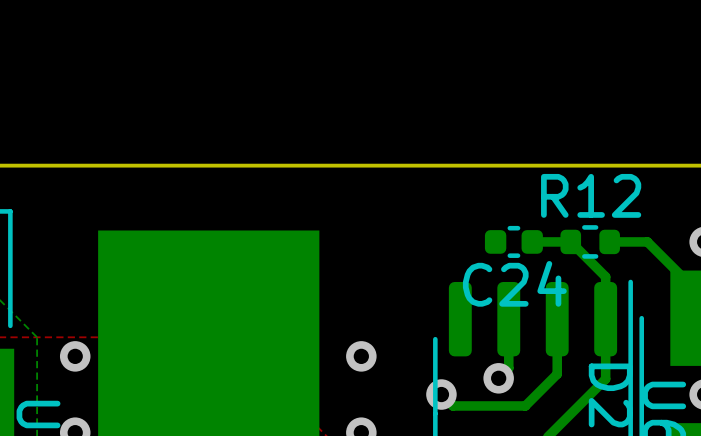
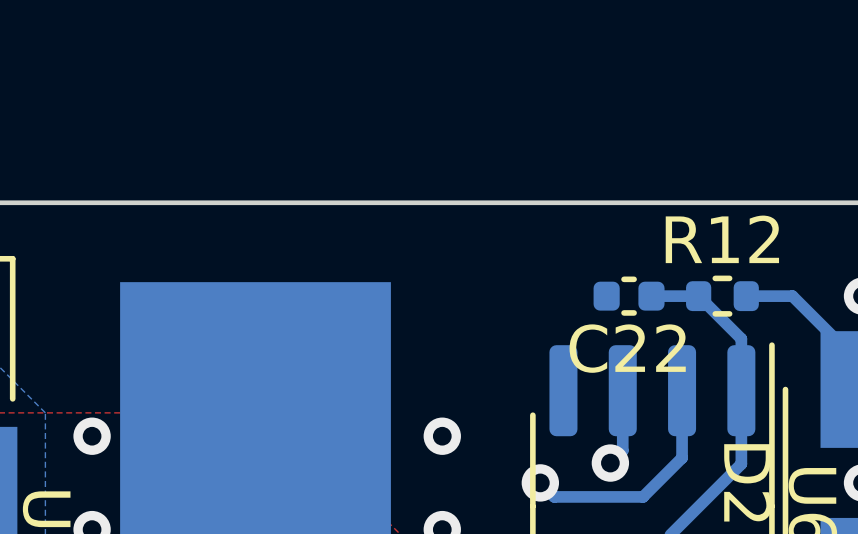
C24 name: C24 (514, 283) -> C22 (627, 348)

